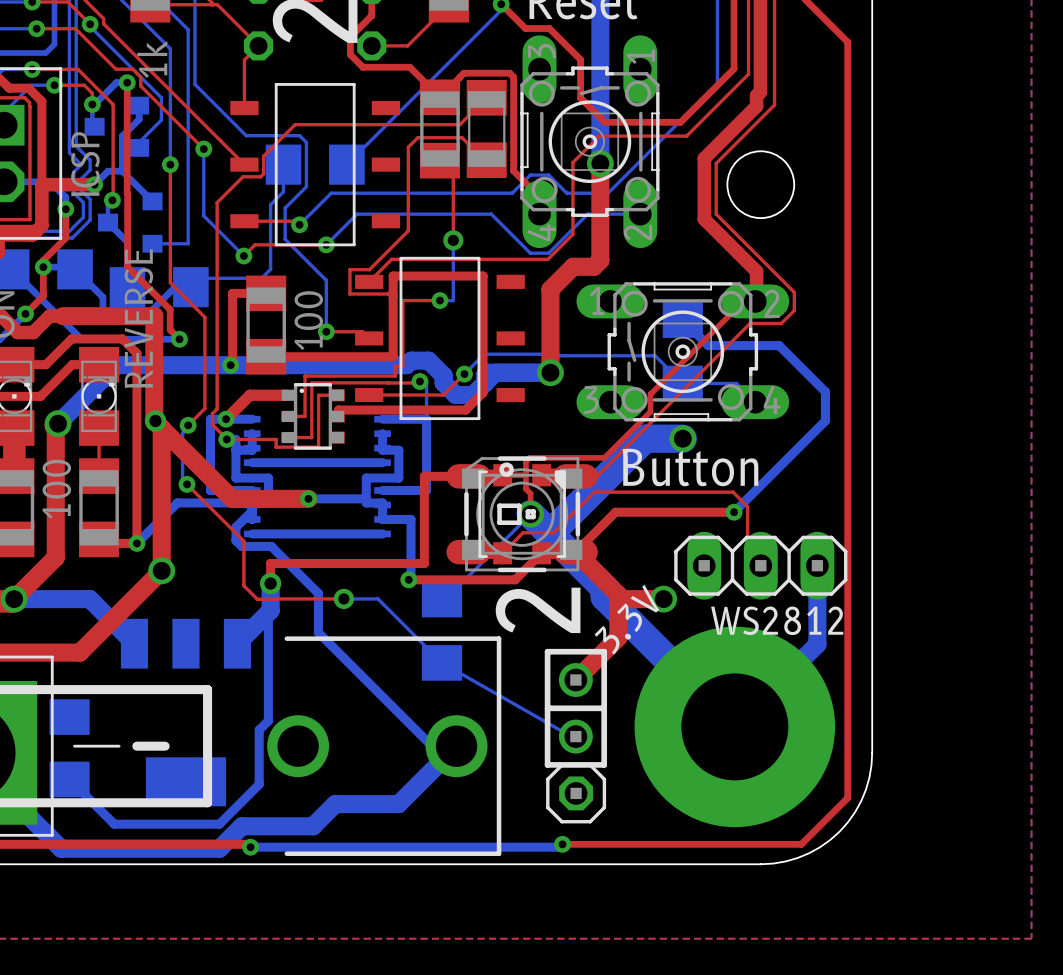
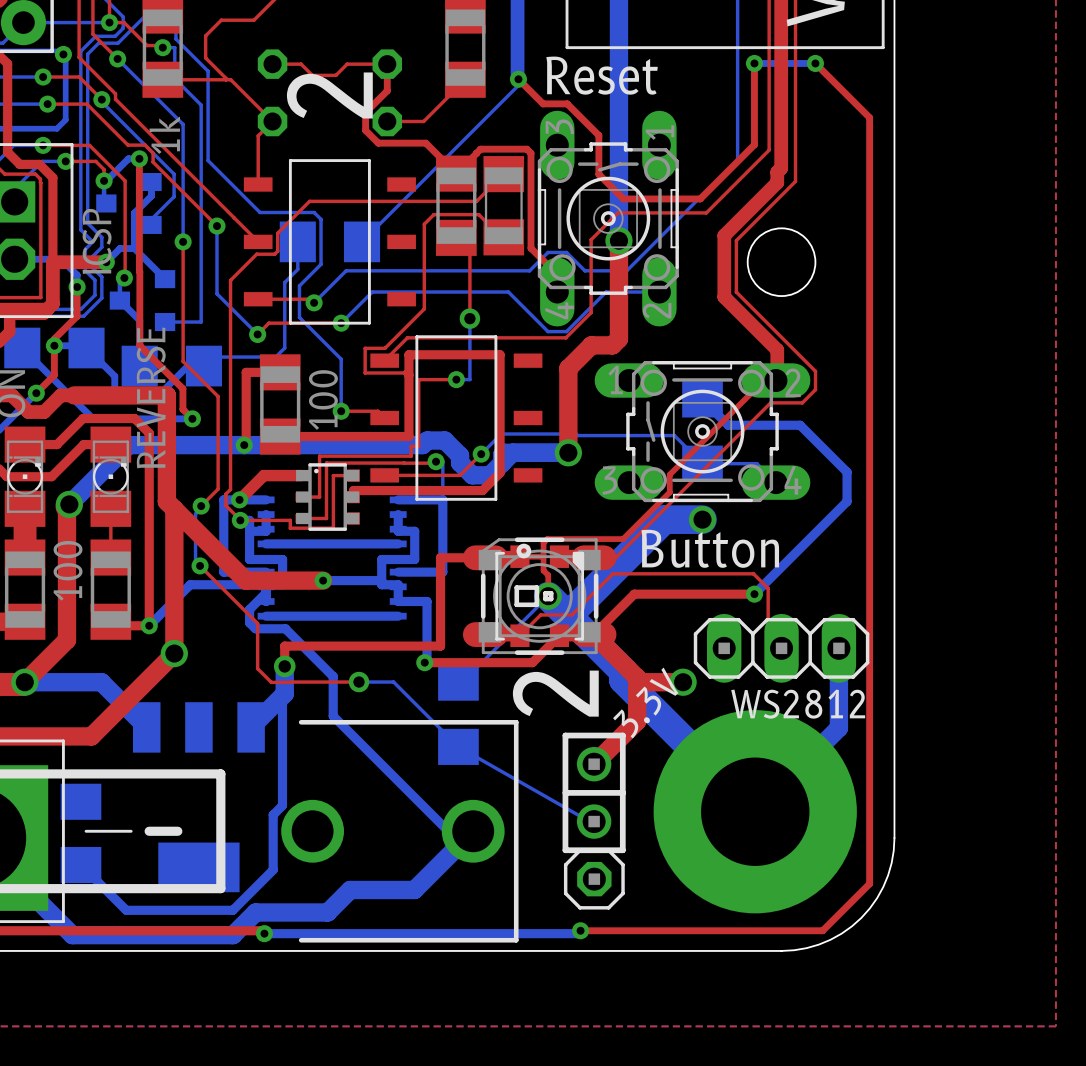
via: (155, 420) -> none

